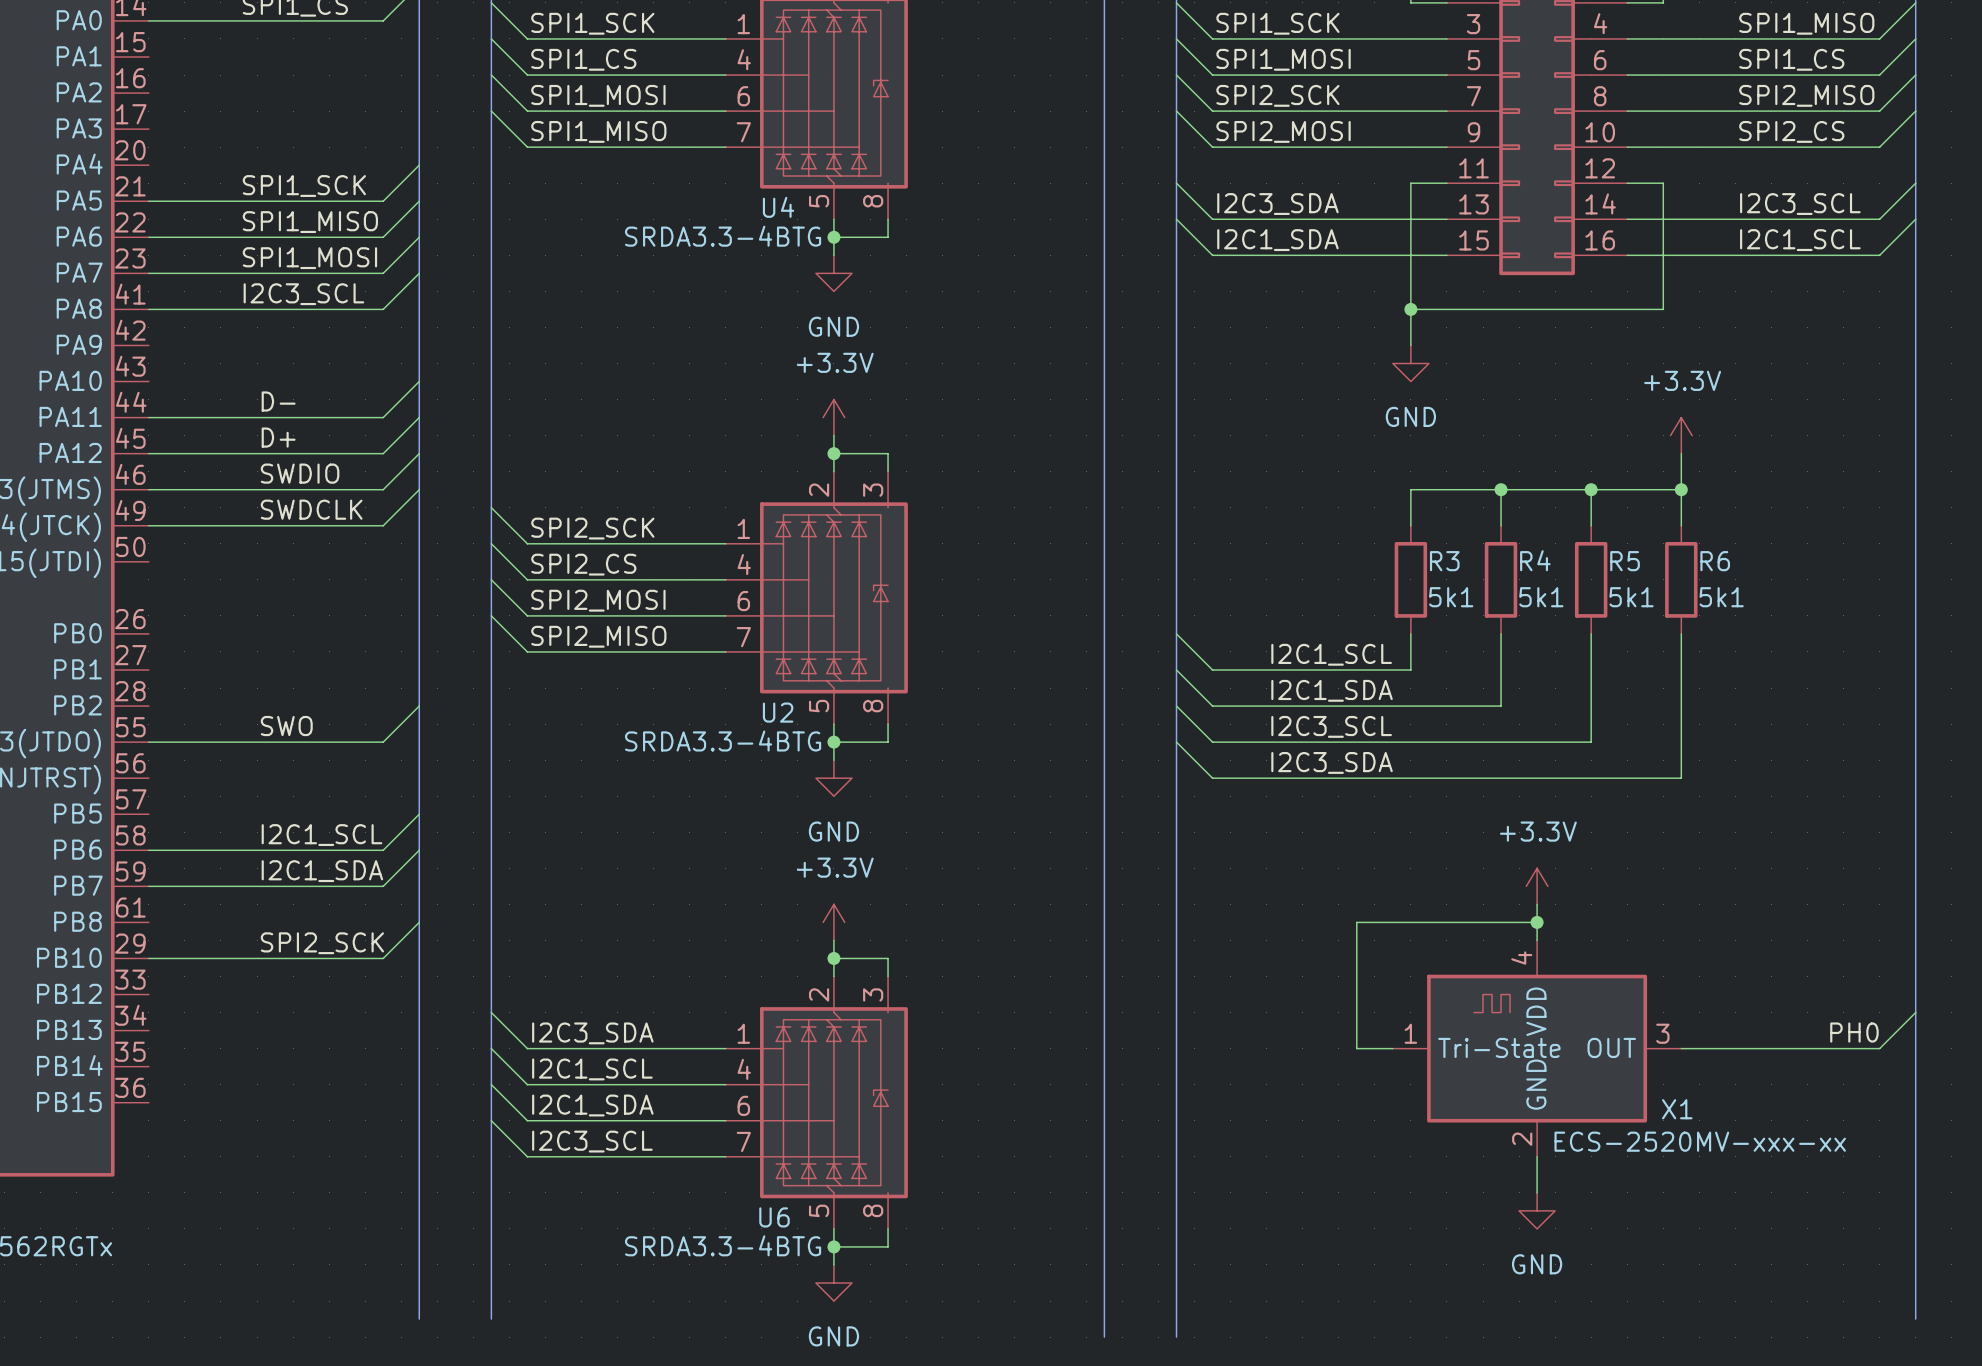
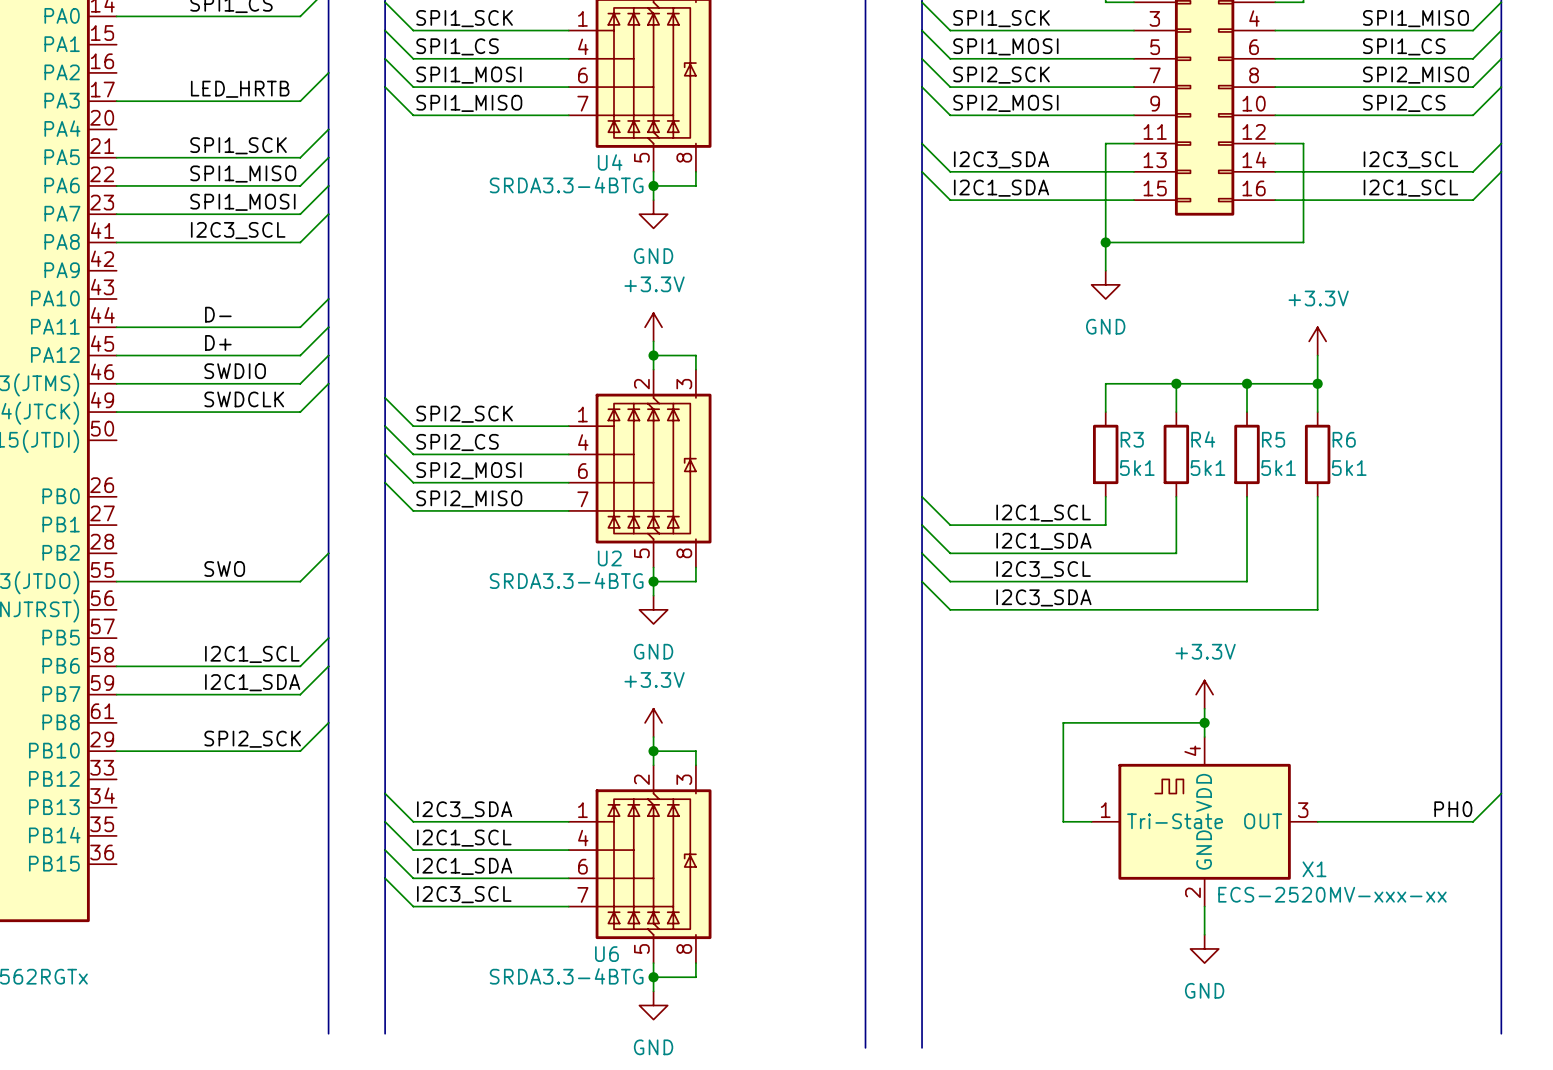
wire: none -> (328, 72) (300, 101) (116, 101)
label: none -> LED_HRTB (240, 89)

